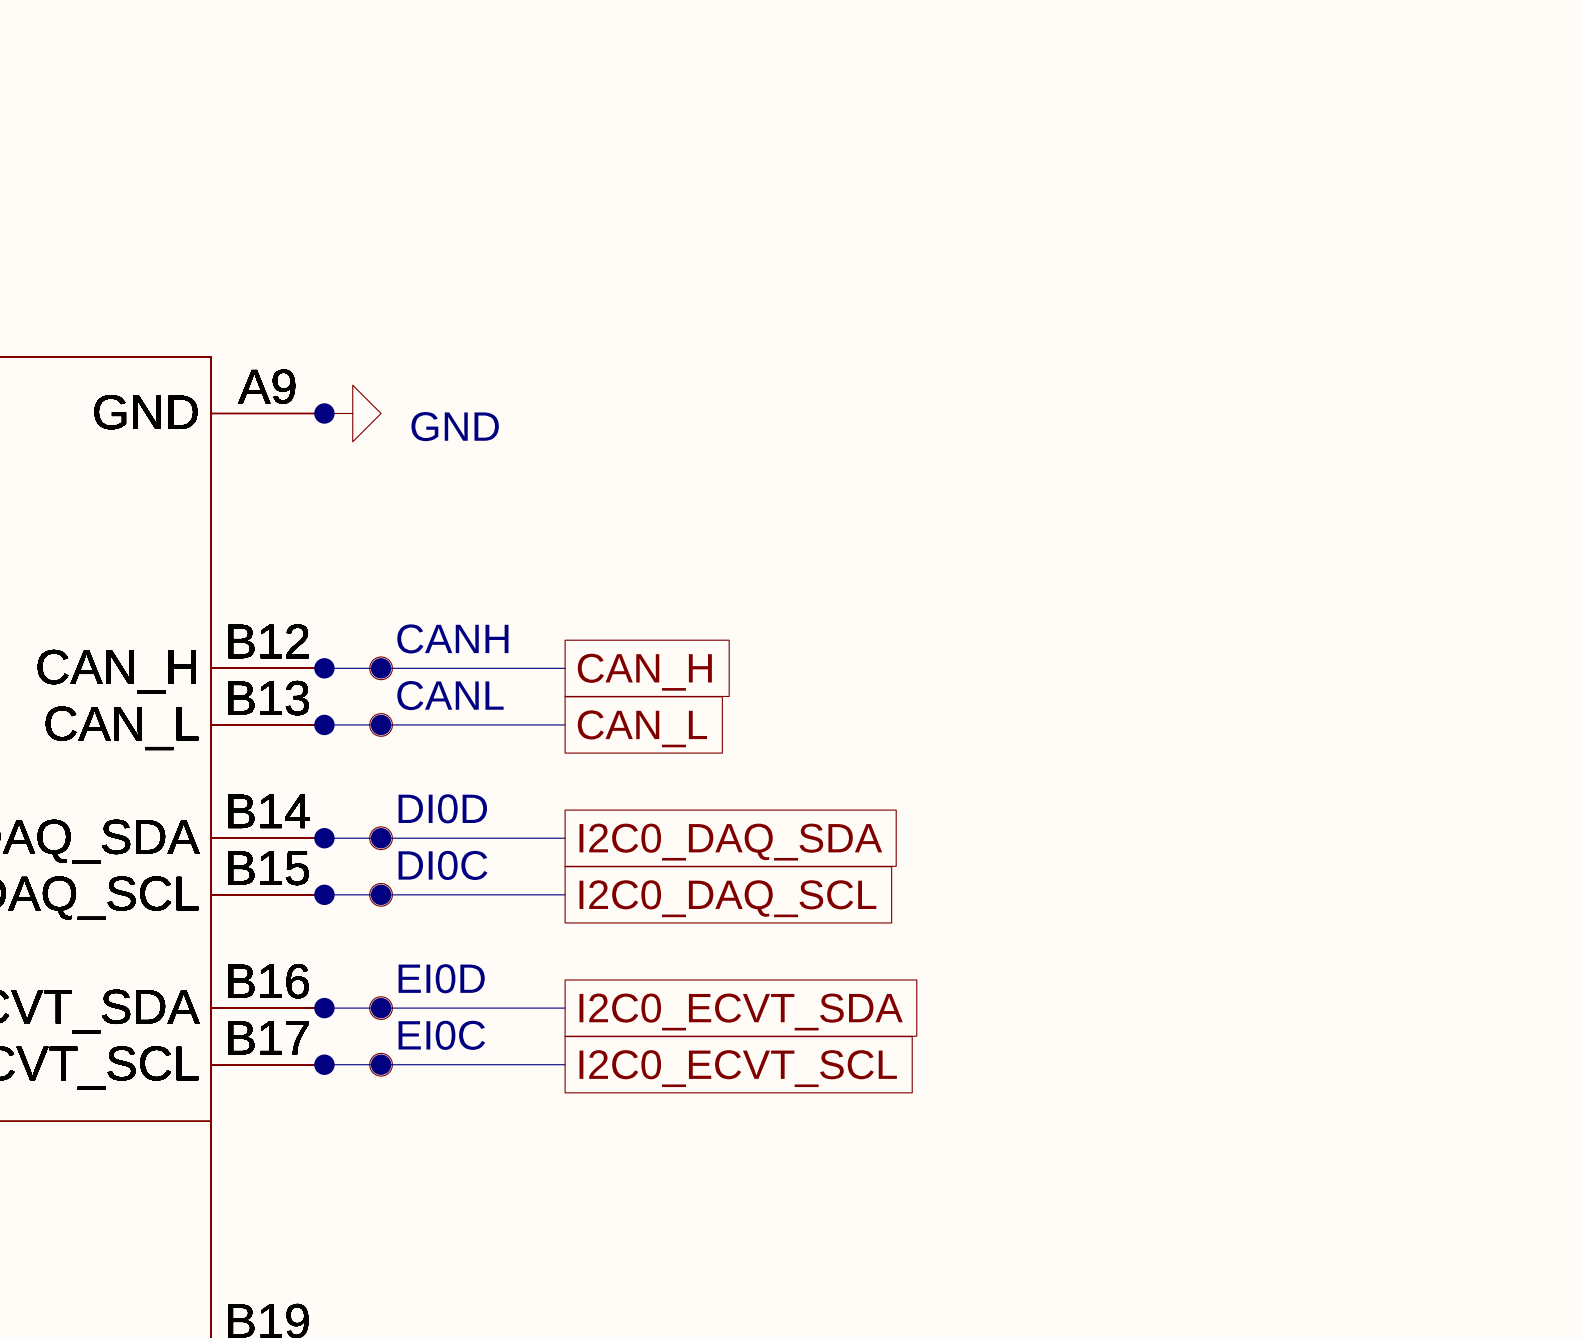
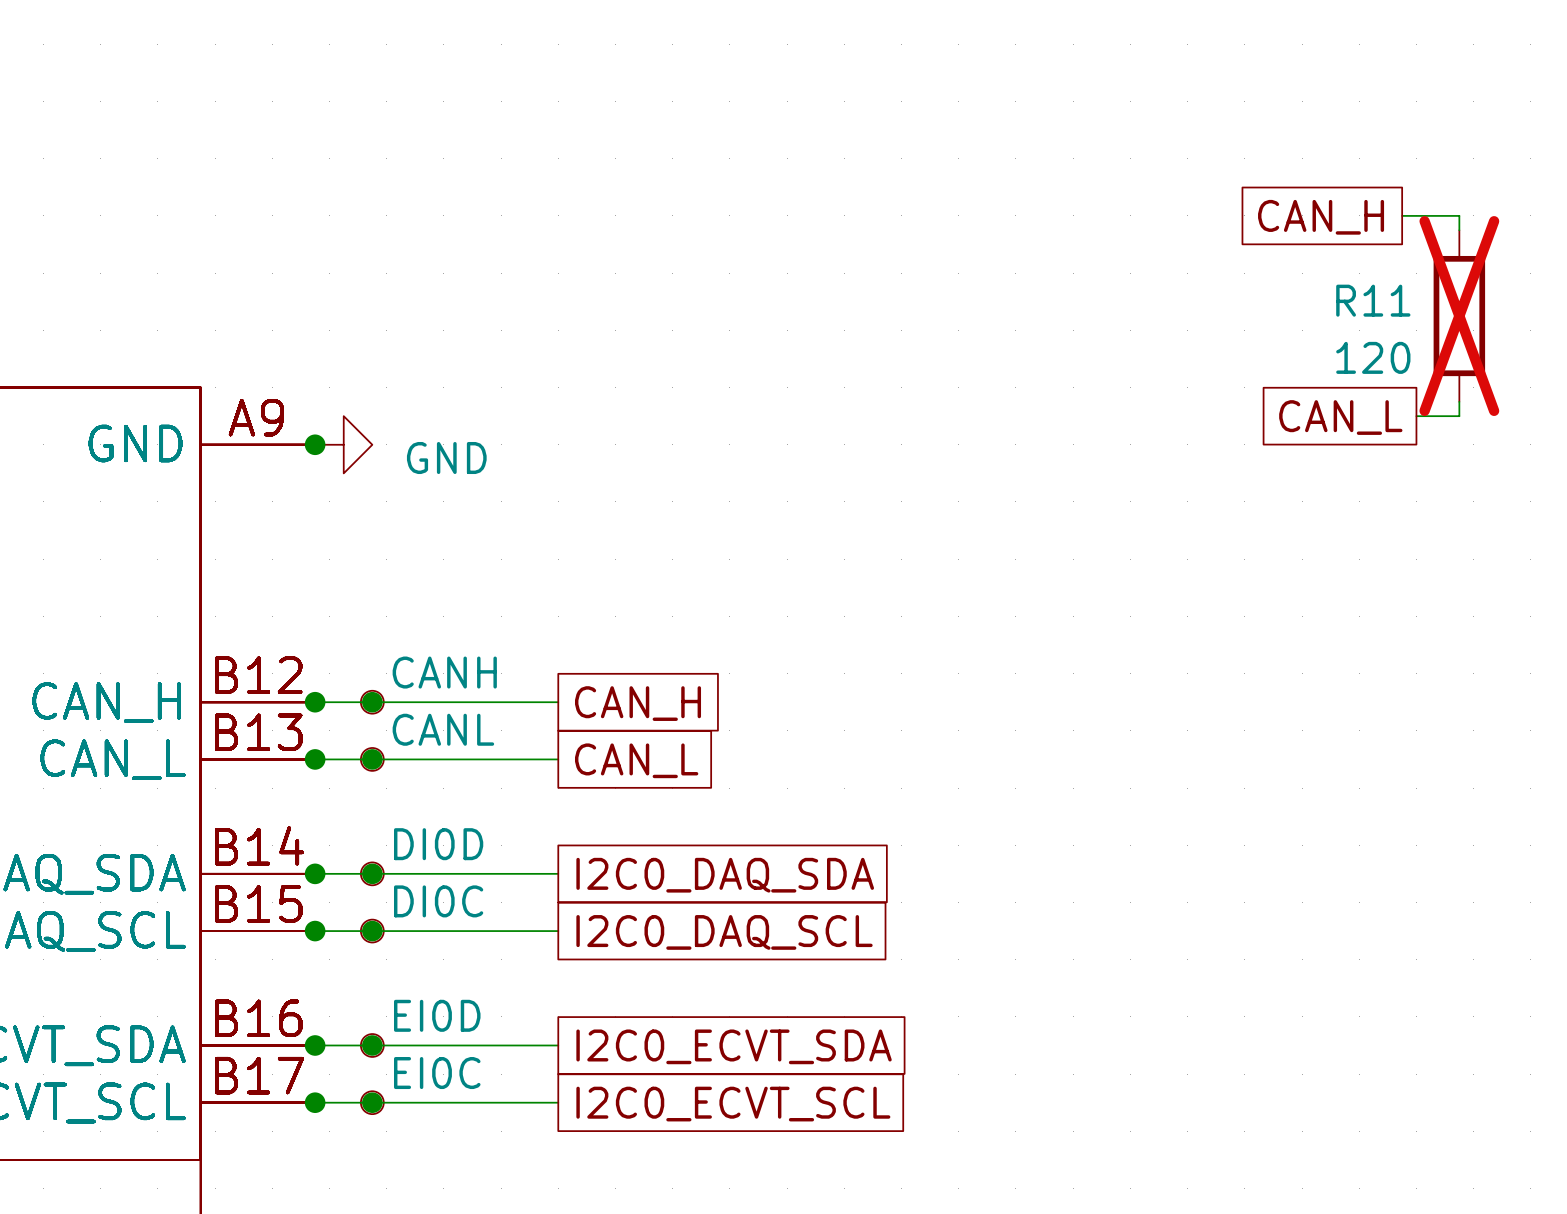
wire: none -> (1402, 215) (1459, 215) (1459, 230)
global label: none -> CAN_H (1321, 217)
R11: none -> 120 (1459, 316)
wire: none -> (1459, 401) (1459, 416) (1416, 416)
global label: none -> CAN_L (1340, 417)

